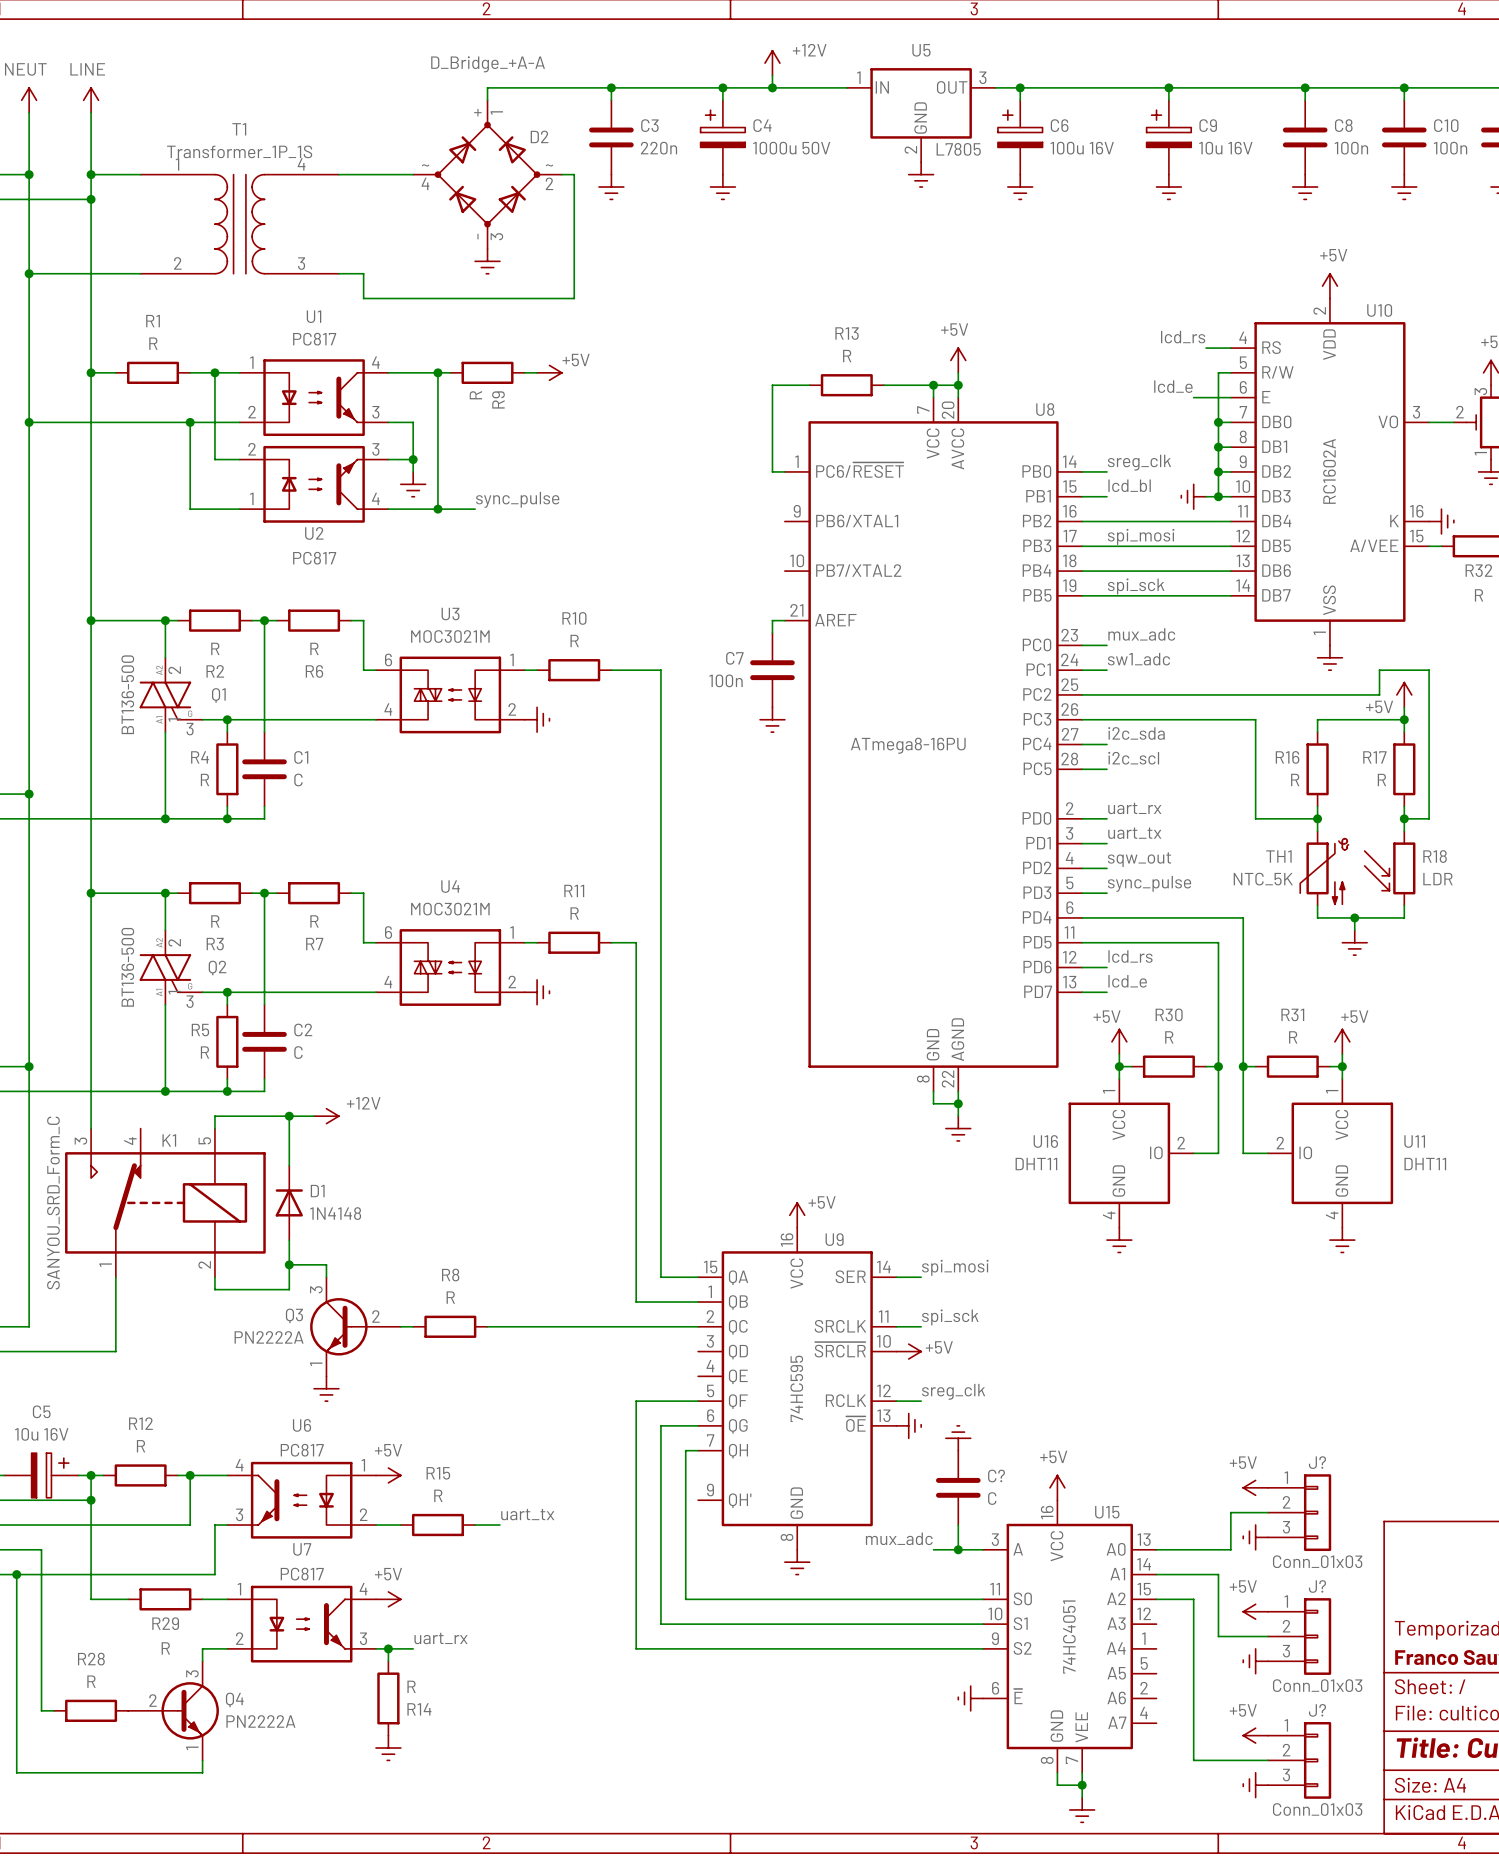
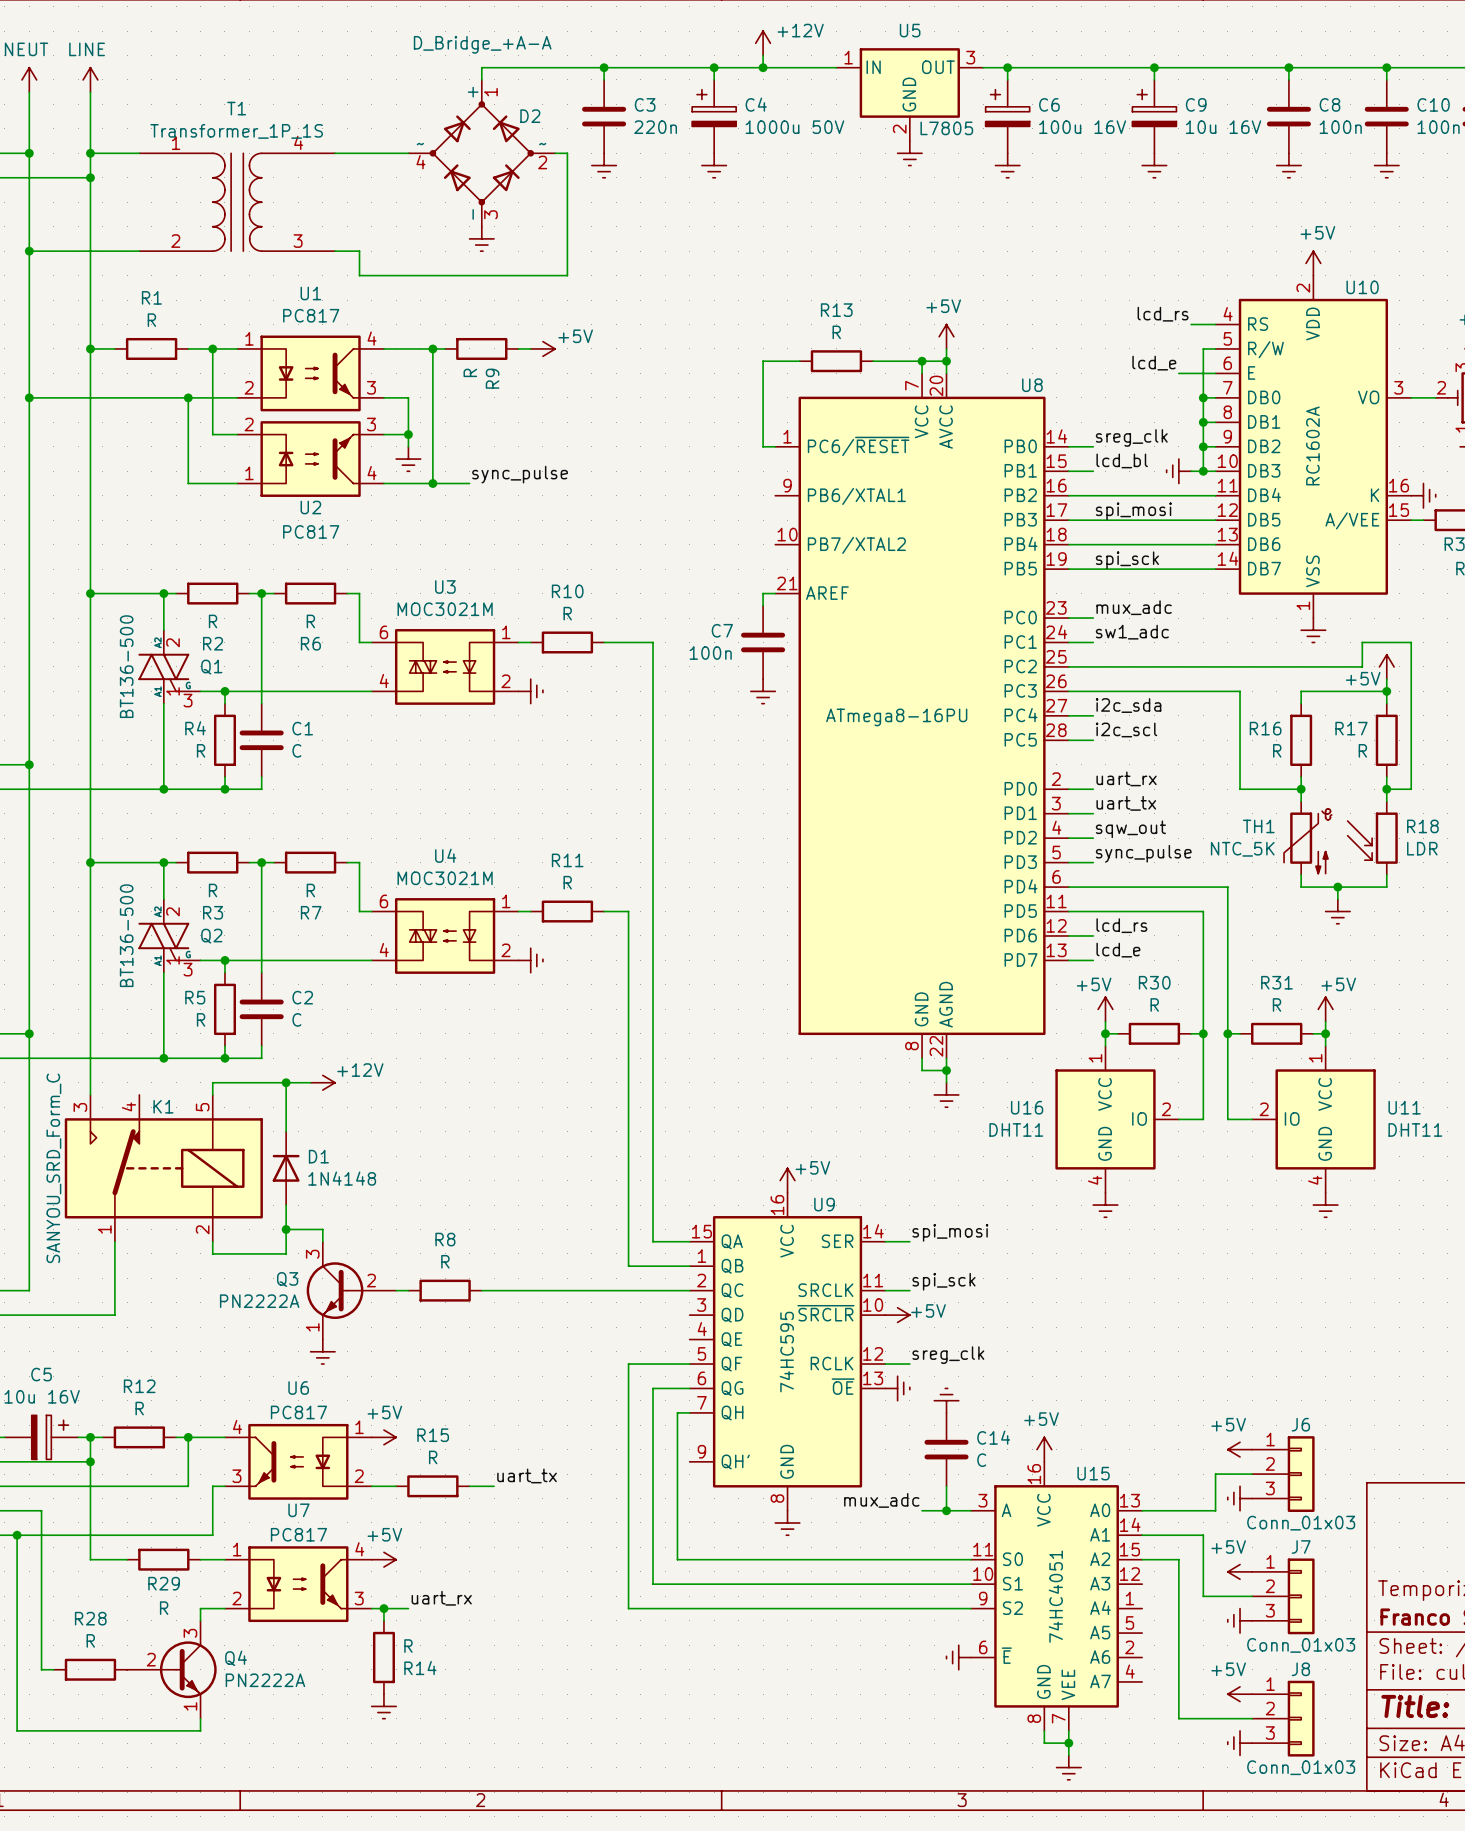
J? name: J? (1317, 1462) -> J6 (1300, 1424)
C? name: C? (996, 1475) -> C14 (993, 1437)
J? name: J? (1317, 1586) -> J7 (1301, 1546)
J? name: J? (1317, 1710) -> J8 (1300, 1669)

